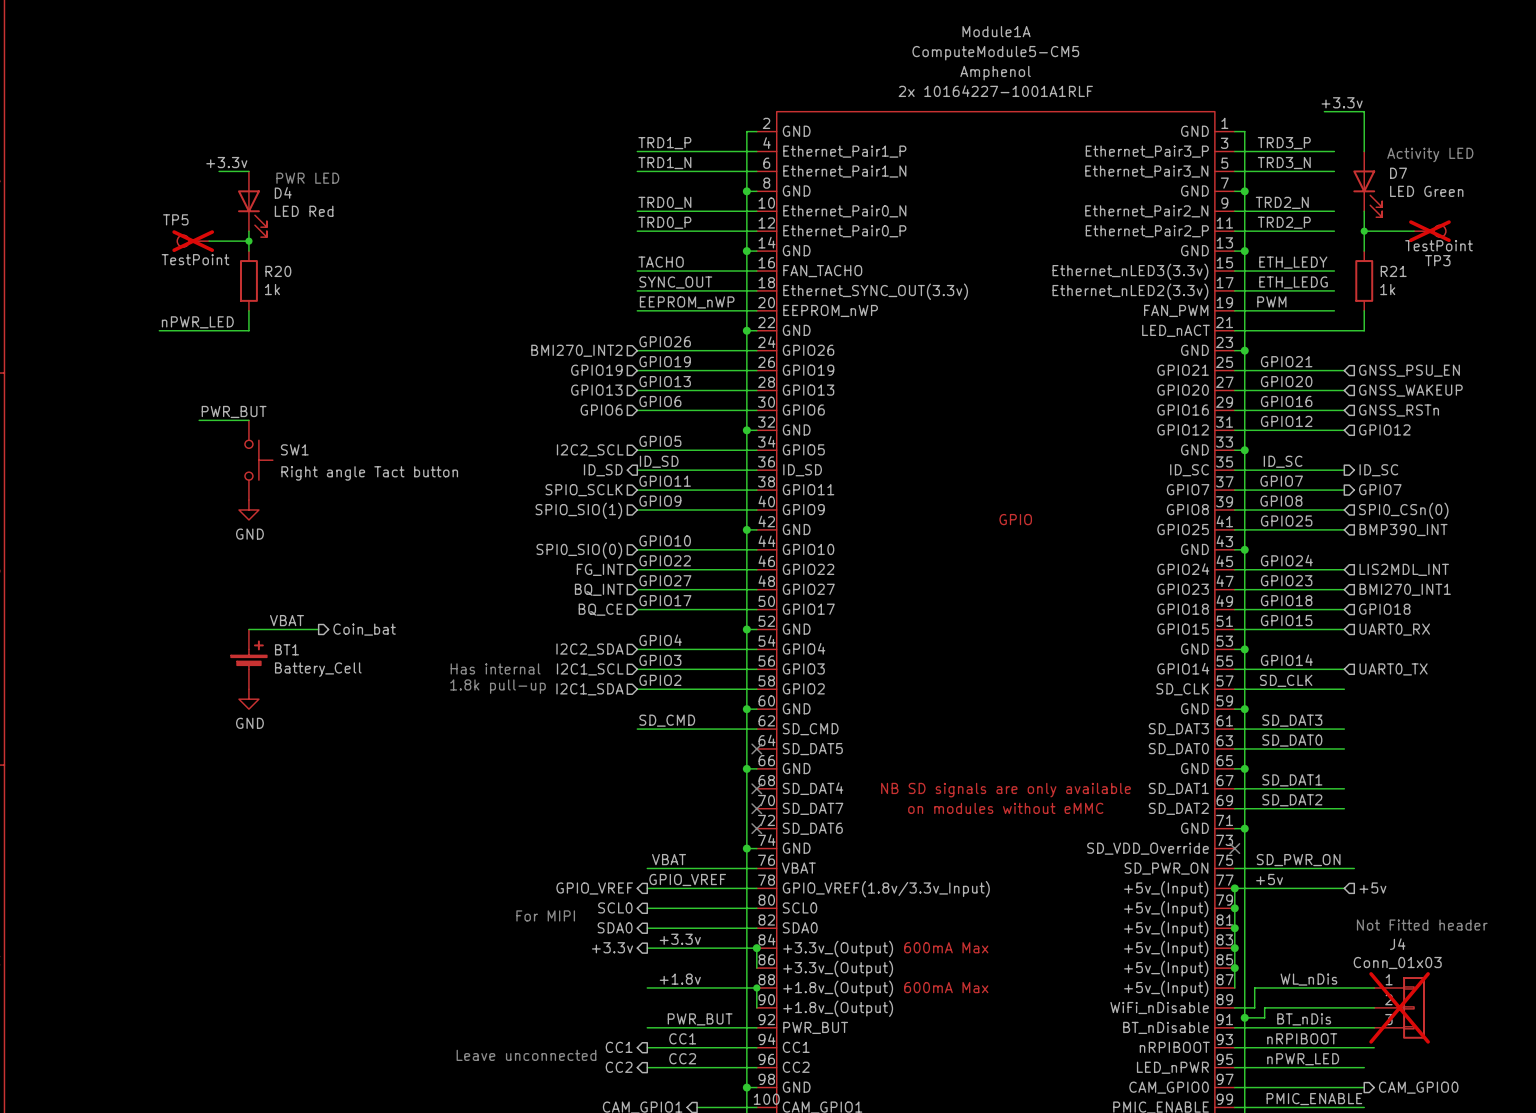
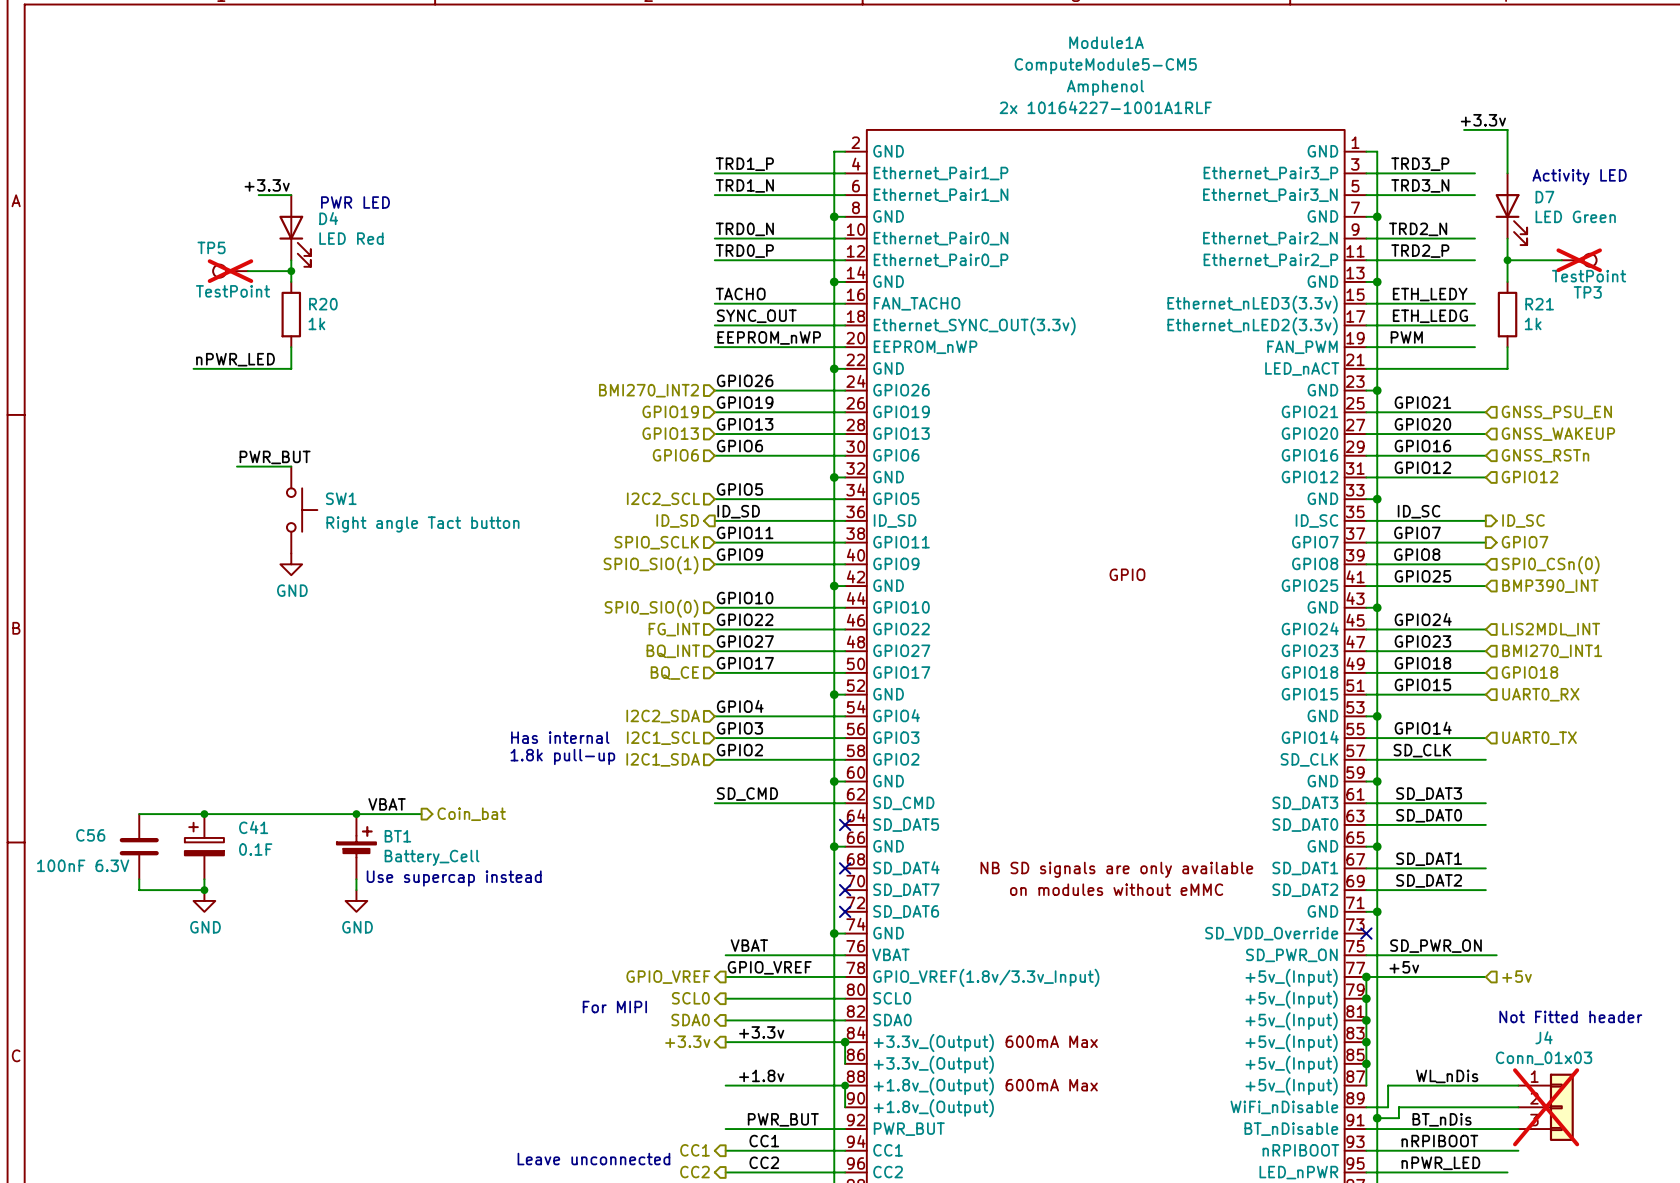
label position: VBAT (286, 620) -> VBAT (387, 804)
wire: (248, 629) (318, 629) -> none
hierarchical label position: Coin_bat (364, 629) -> Coin_bat (471, 814)
BT1 position: (248, 659) -> (356, 846)
power symbol: GND (248, 699) -> none
wire: none -> (139, 814) (421, 814)
junction: none -> (204, 814)
junction: none -> (356, 814)
C56: none -> 100nF 6.3V (139, 846)
C41: none -> 0.1F (204, 846)
wire: none -> (139, 879) (139, 890) (204, 890) (204, 879)
wire: none -> (356, 879) (356, 890)
text: none -> Use supercap instead (454, 878)
junction: none -> (204, 890)
power symbol: none -> GND (204, 900)
power symbol: none -> GND (356, 900)

